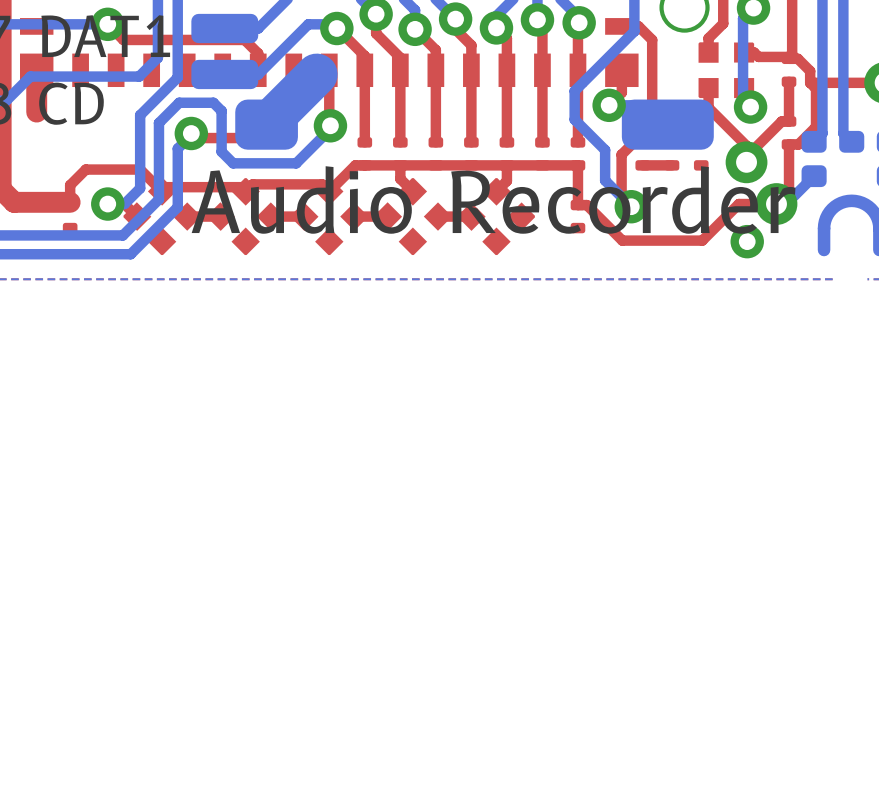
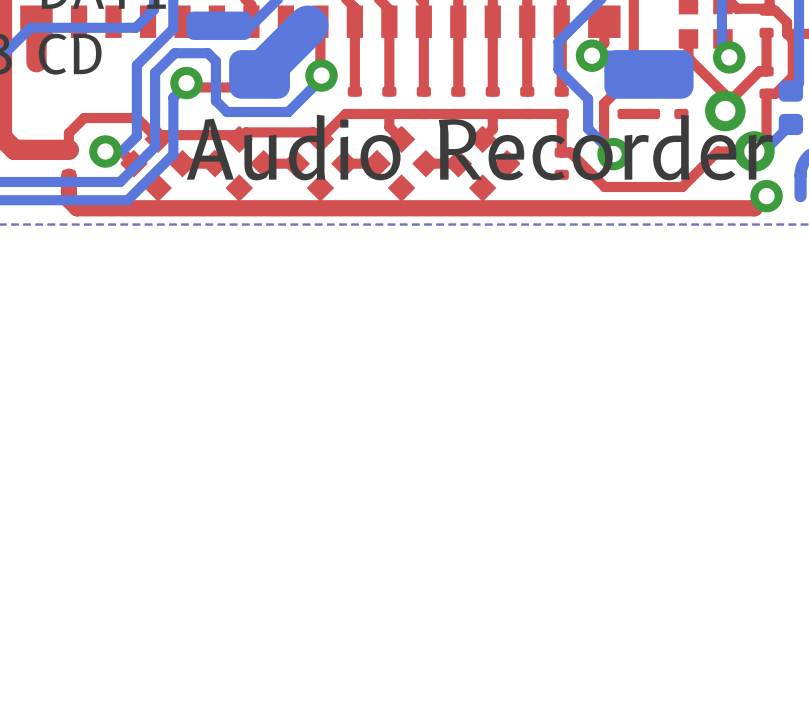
top track: none -> (68, 176) (68, 200) (77, 208) (754, 208) (766, 196)
via position: (747, 241) -> (766, 196)

